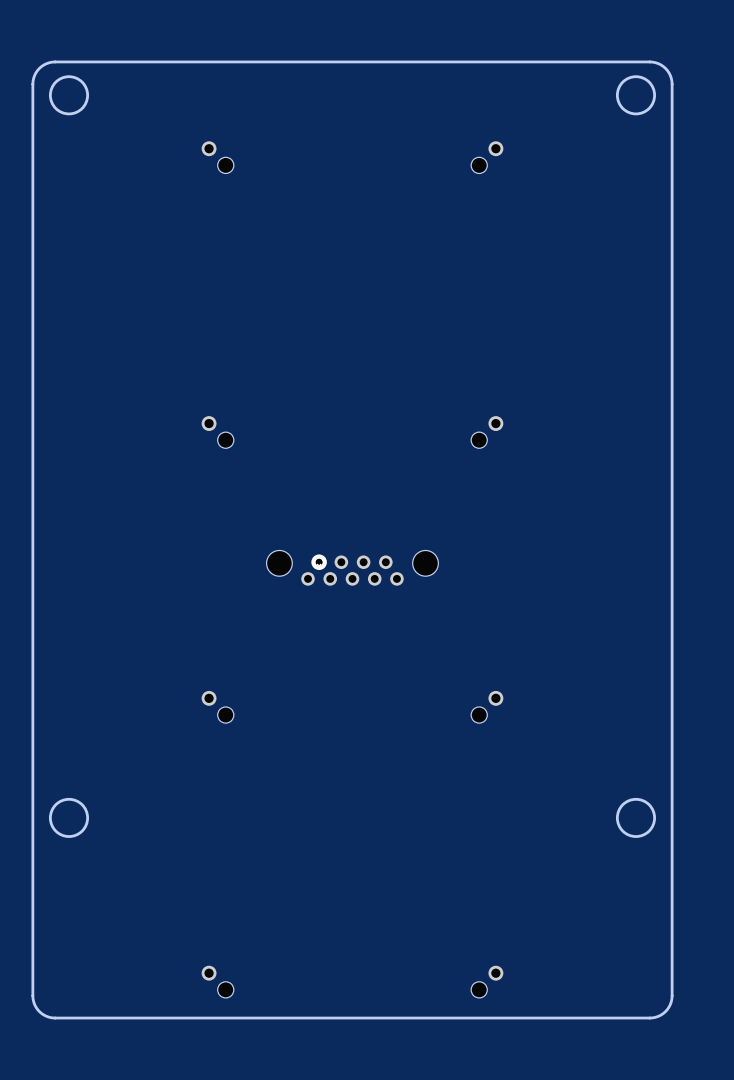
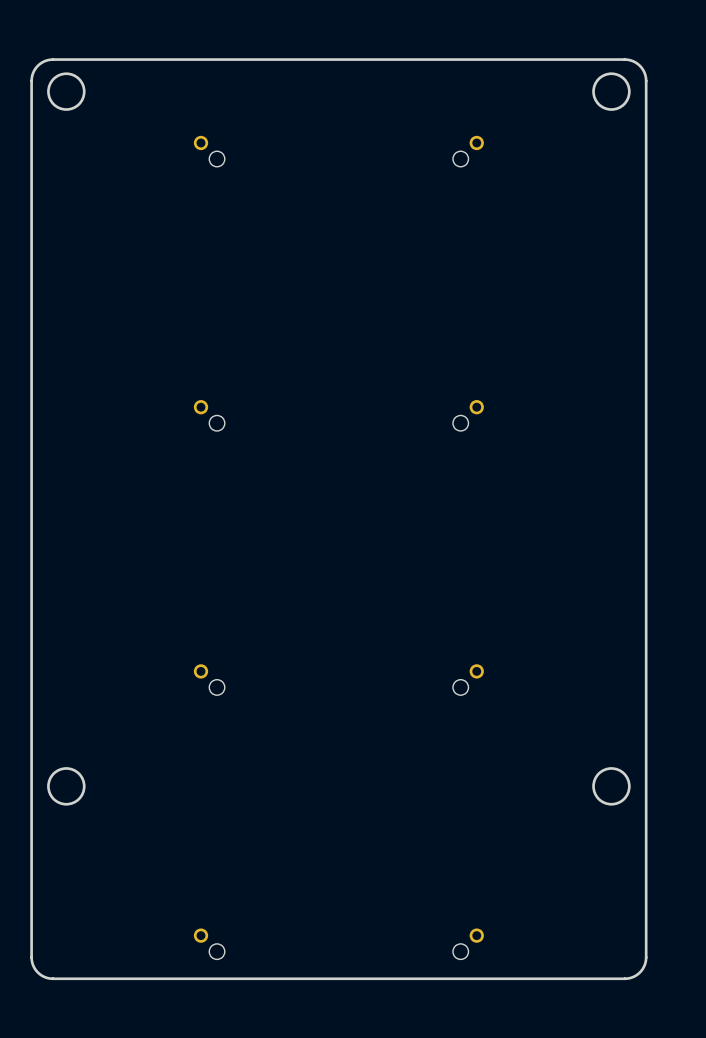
part: (352, 568) -> none

